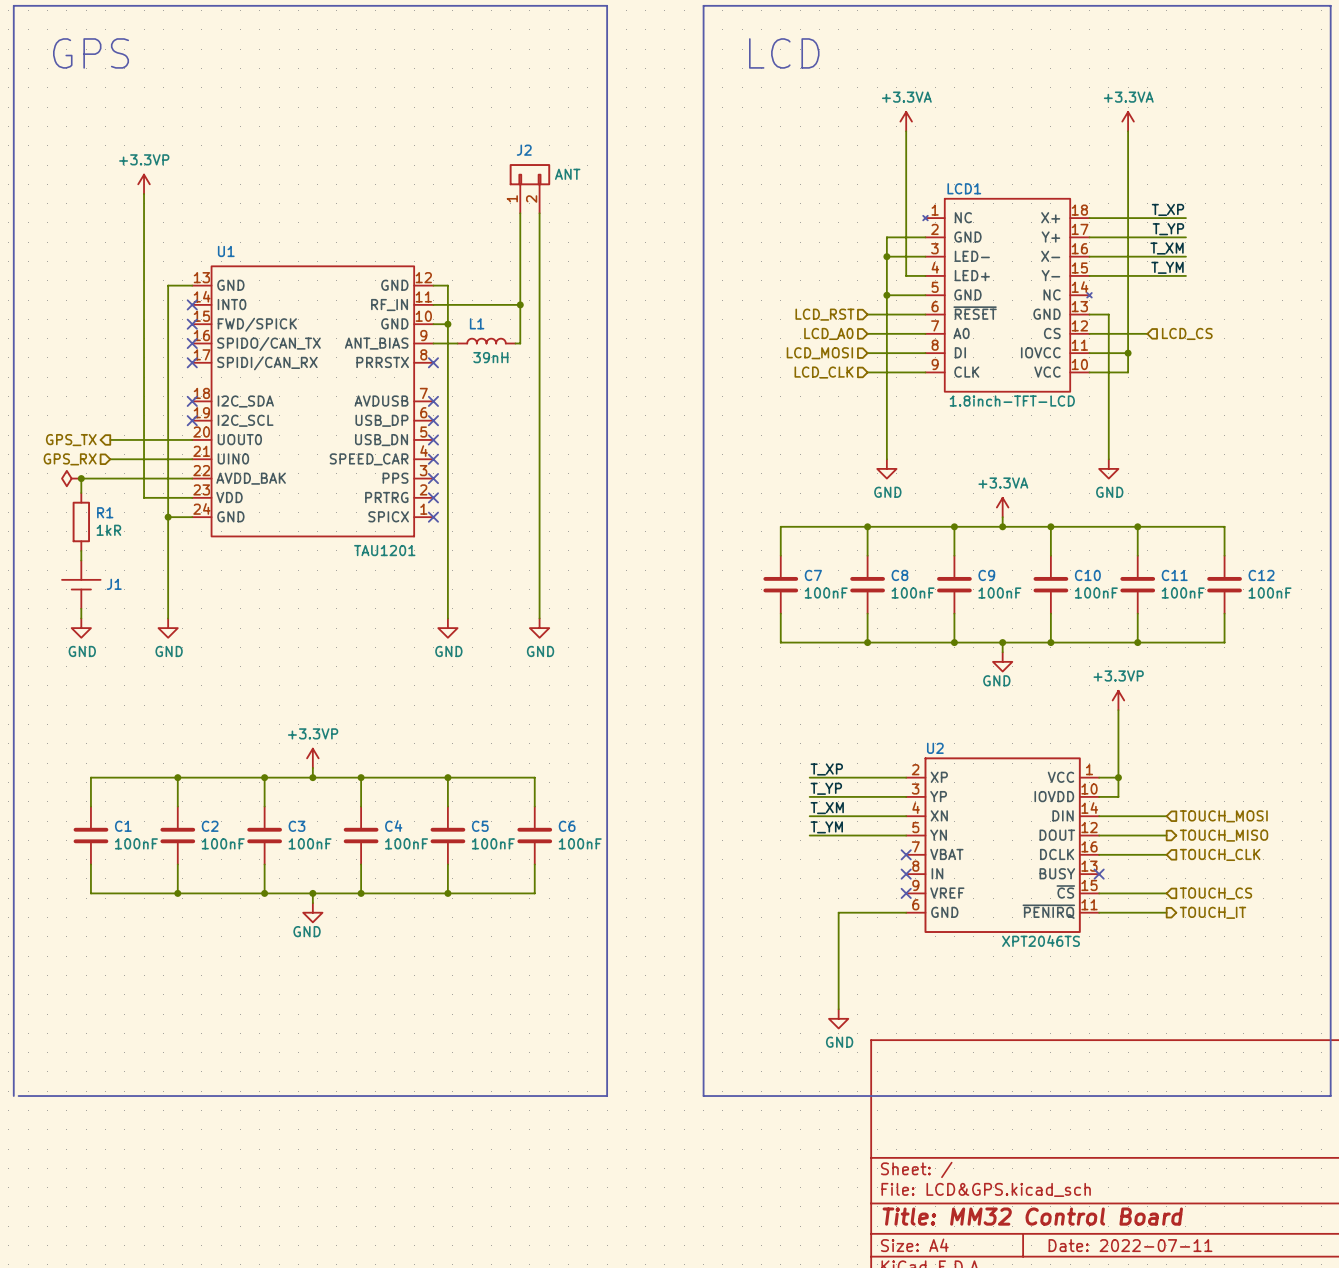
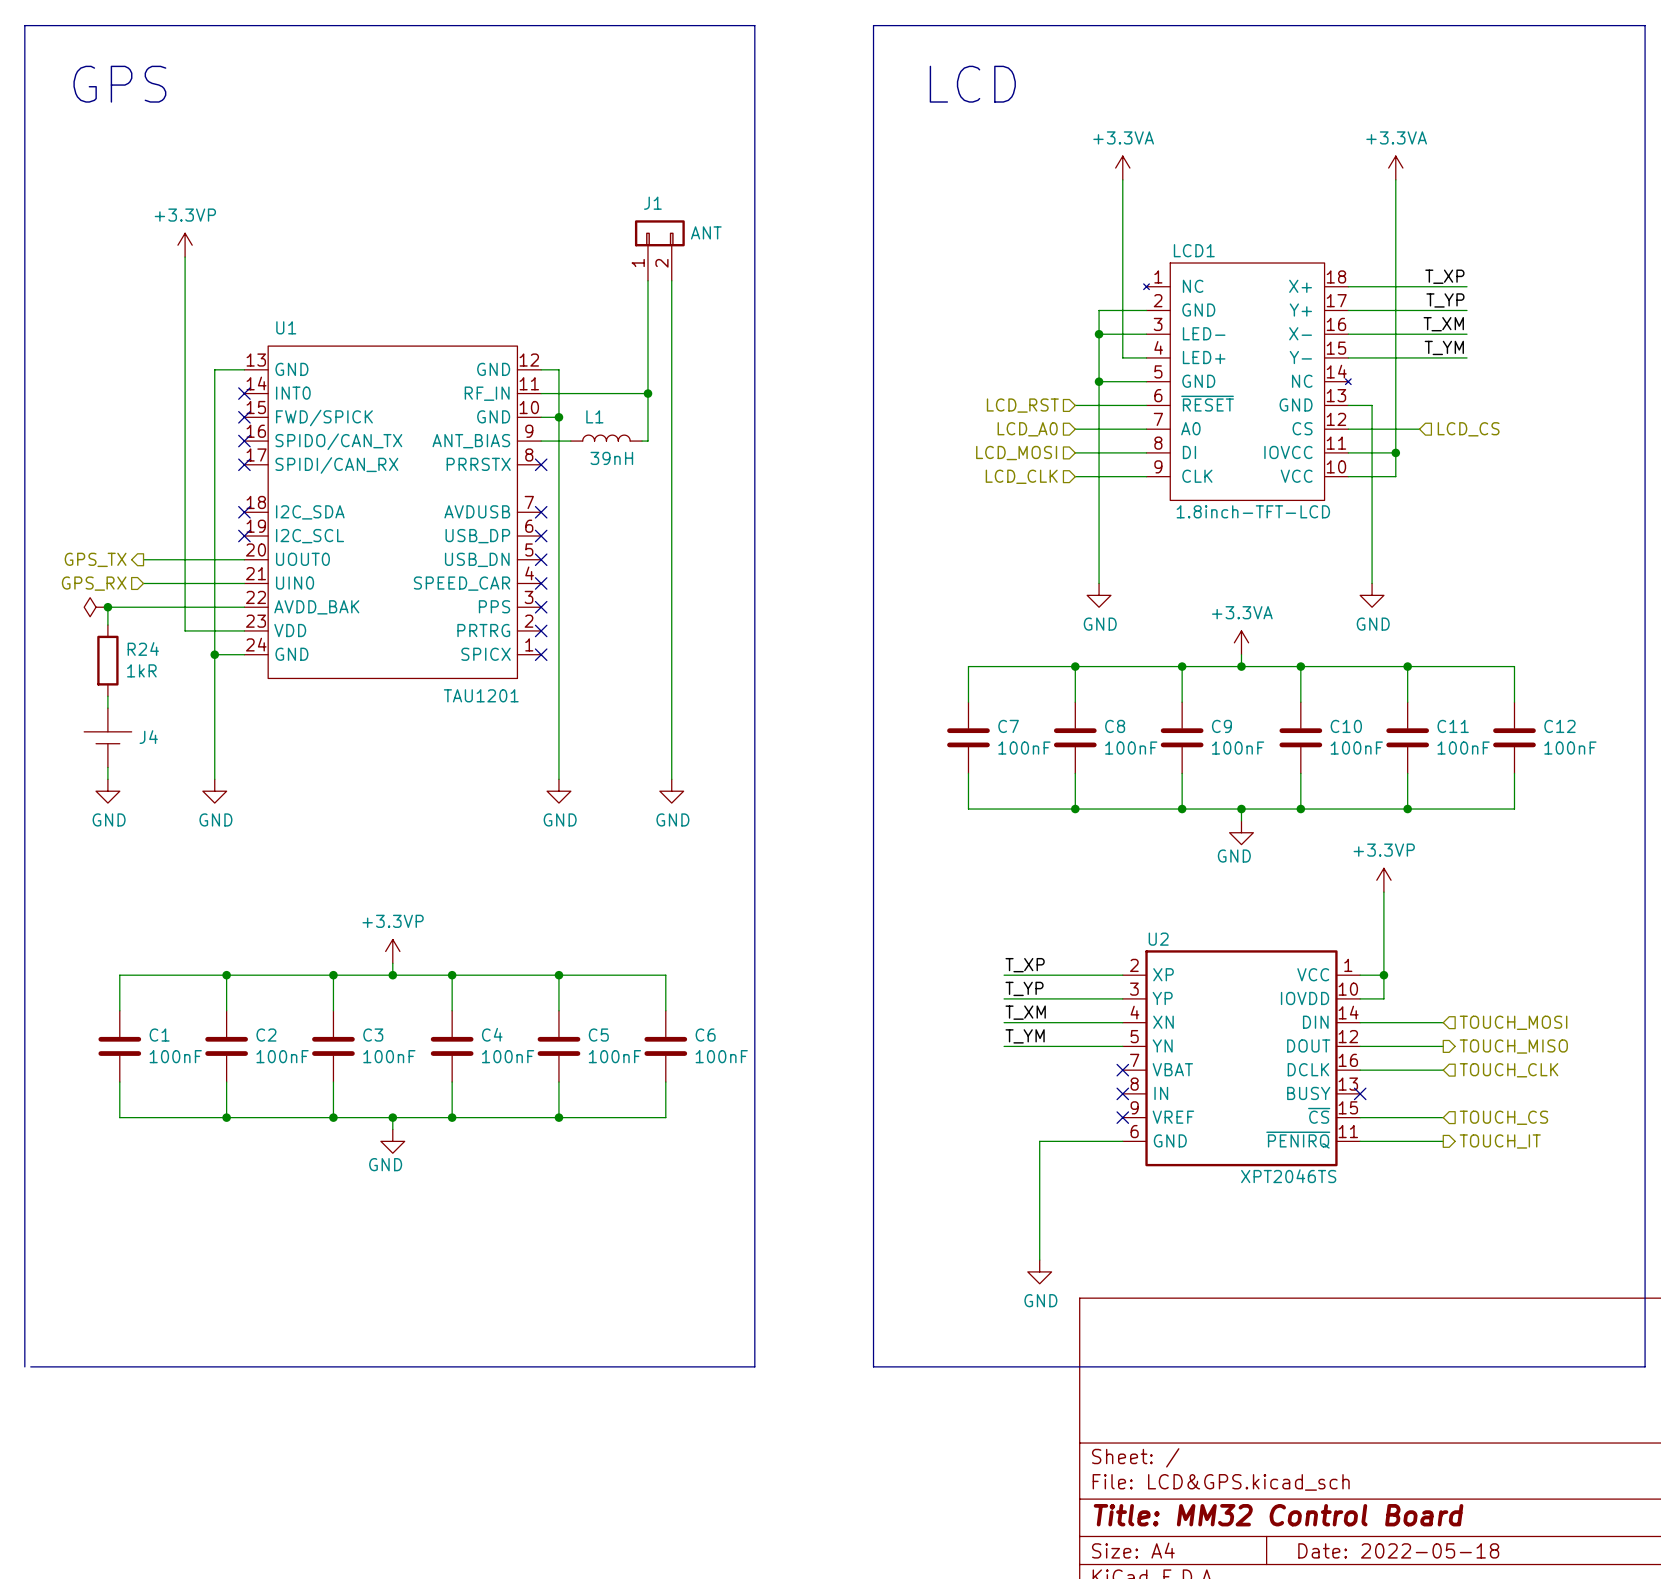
J2 name: J2 (524, 150) -> J1 (652, 203)
R1 name: R1 (105, 512) -> R24 (143, 648)
J1 name: J1 (114, 584) -> J4 (148, 737)
title block: Date: 2022-07-11 (1130, 1245) -> Date: 2022-05-18 (1398, 1550)

